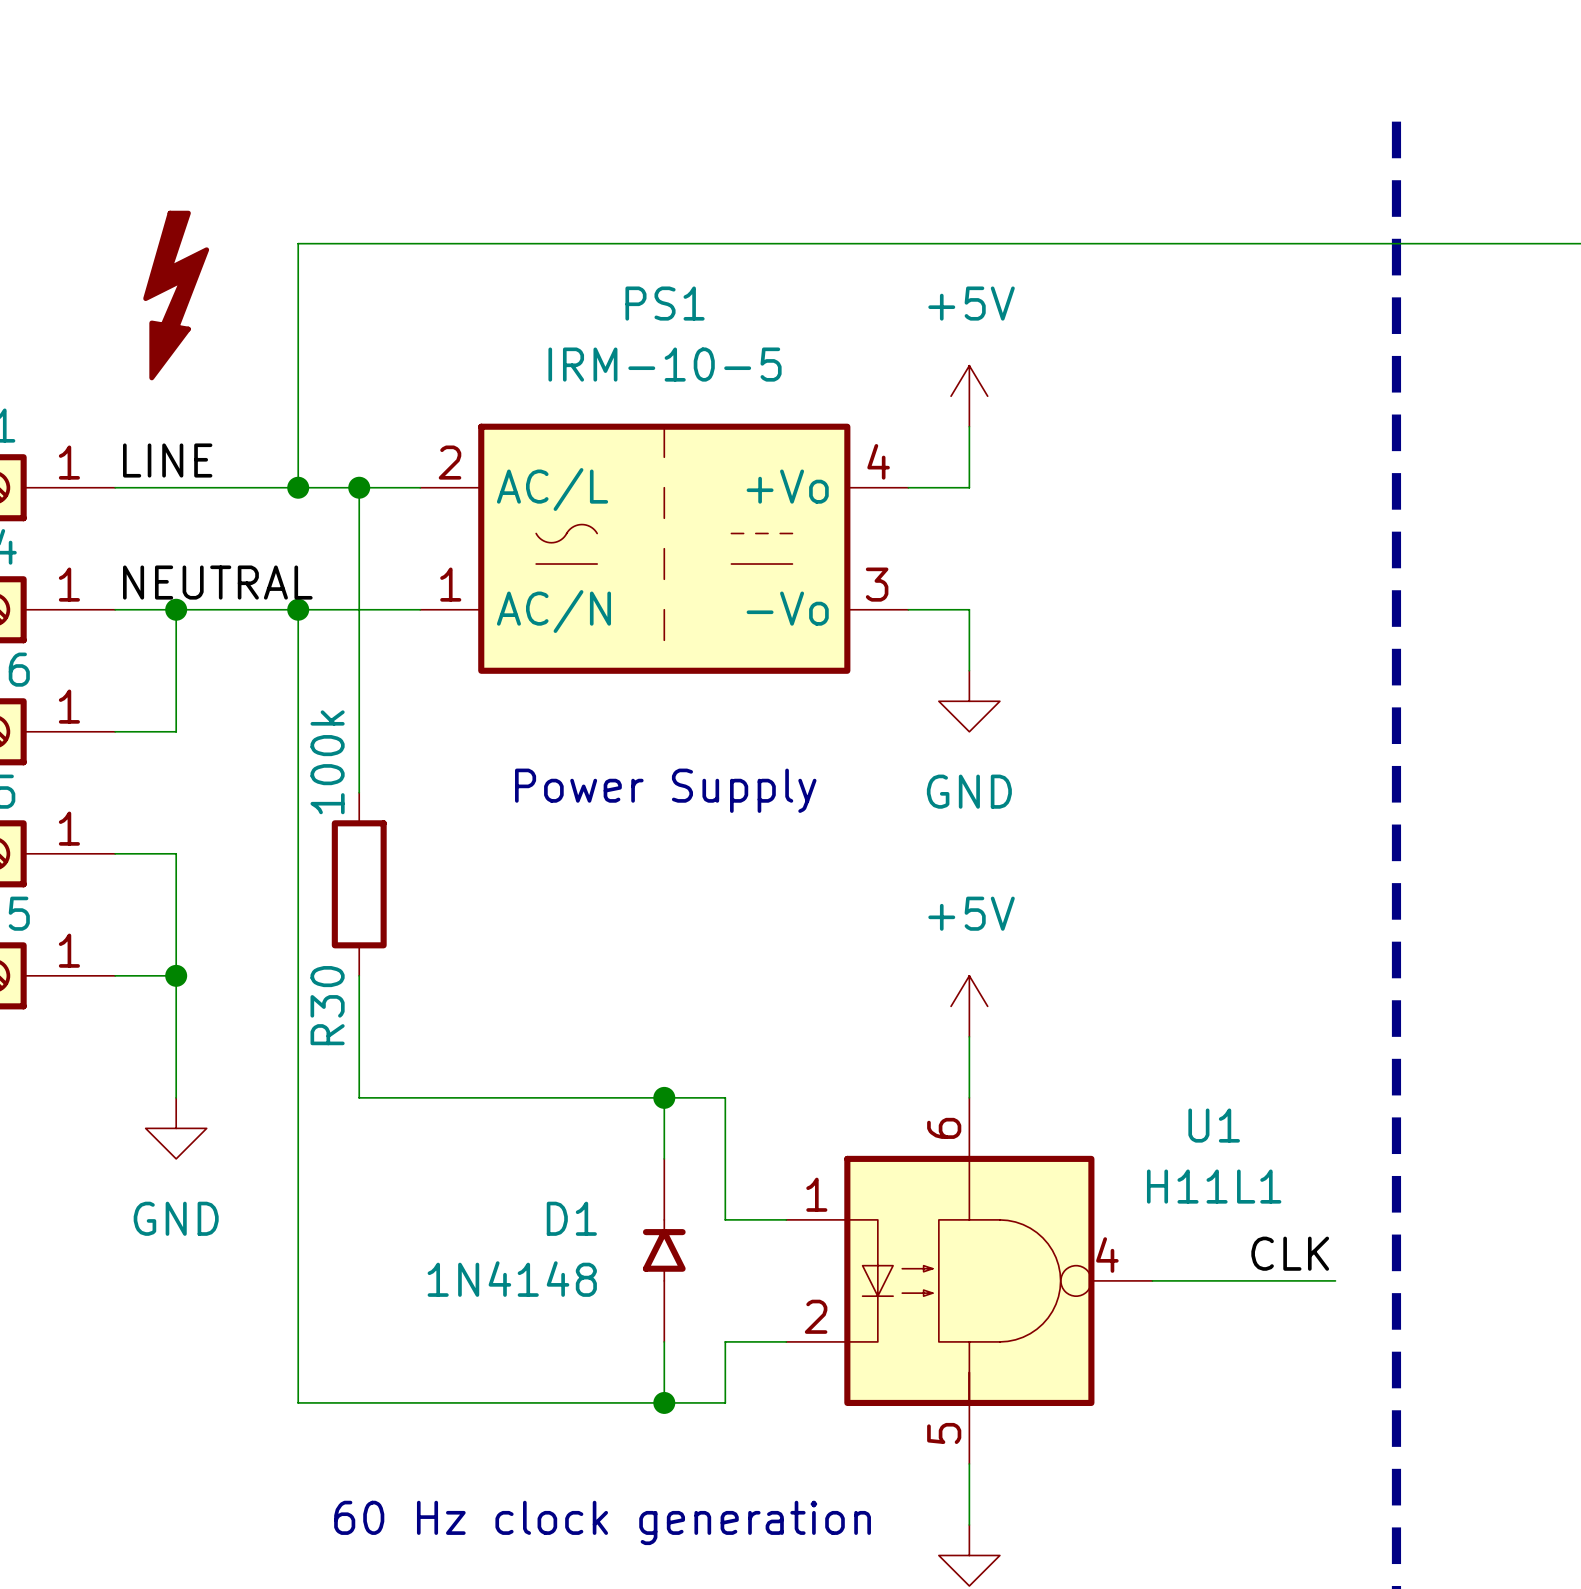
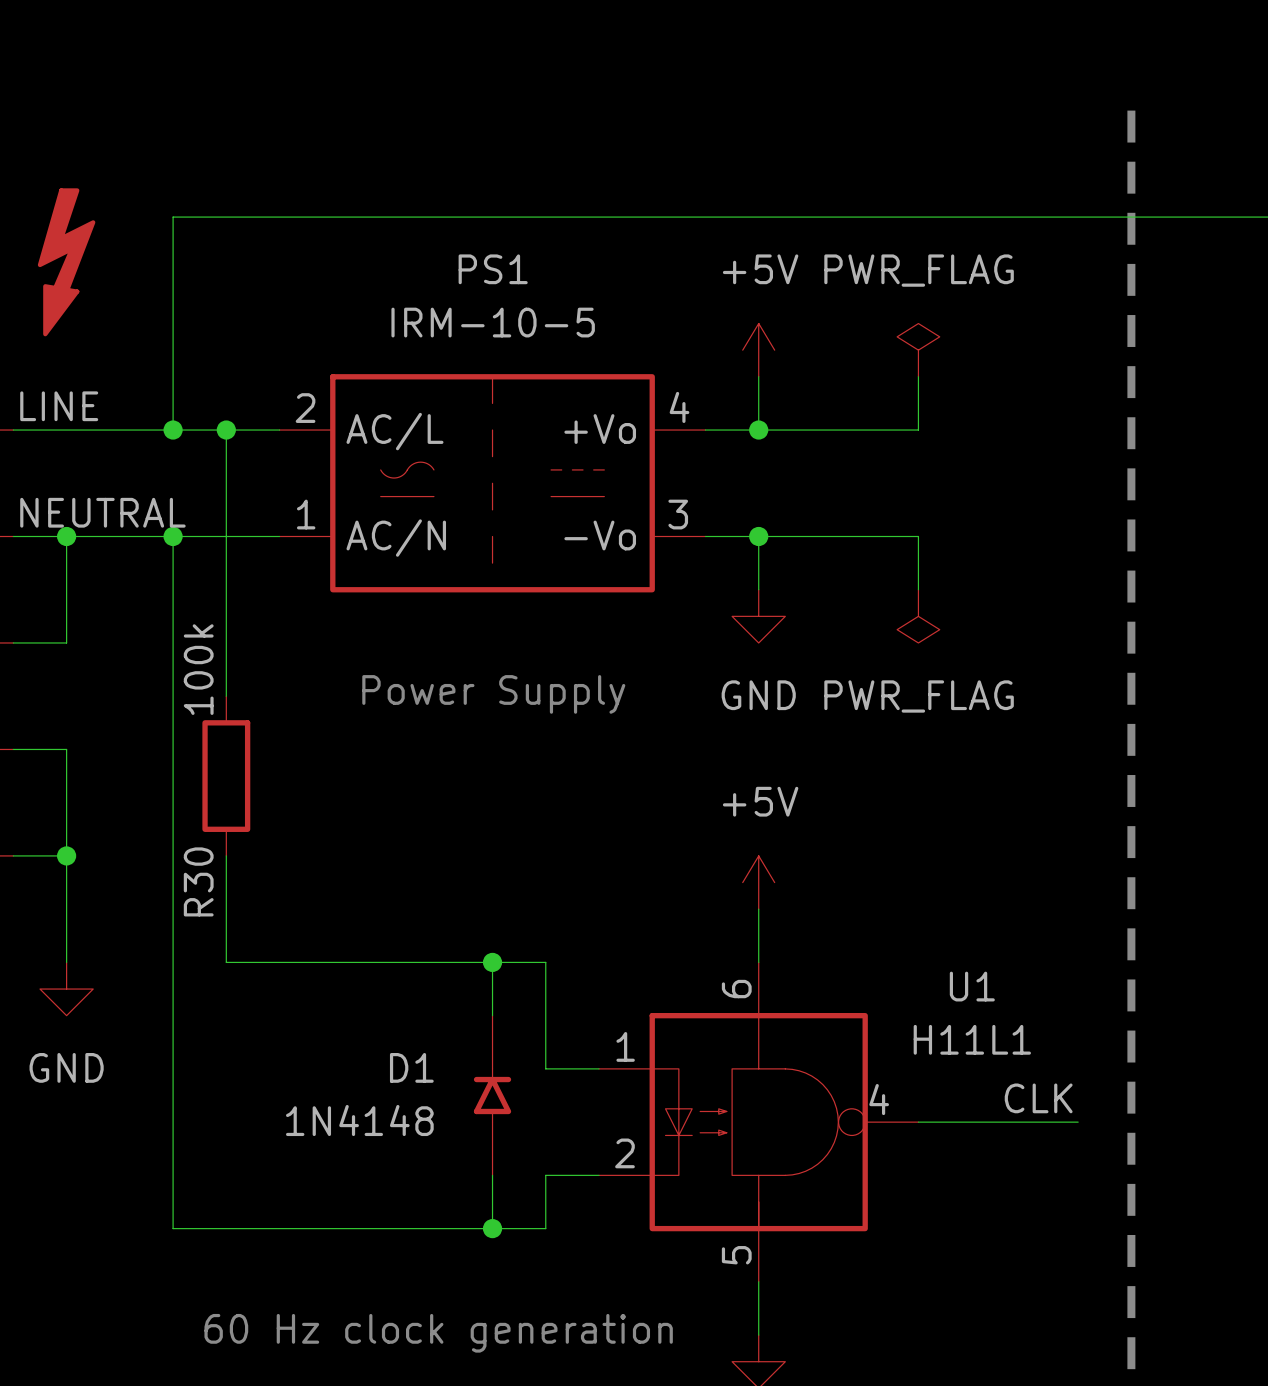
power symbol: none -> PWR_FLAG (918, 350)
wire: none -> (918, 376) (918, 430) (758, 430)
junction: none -> (758, 430)
wire: none -> (758, 536) (918, 536) (918, 589)
junction: none -> (758, 536)
power symbol: none -> PWR_FLAG (918, 616)

